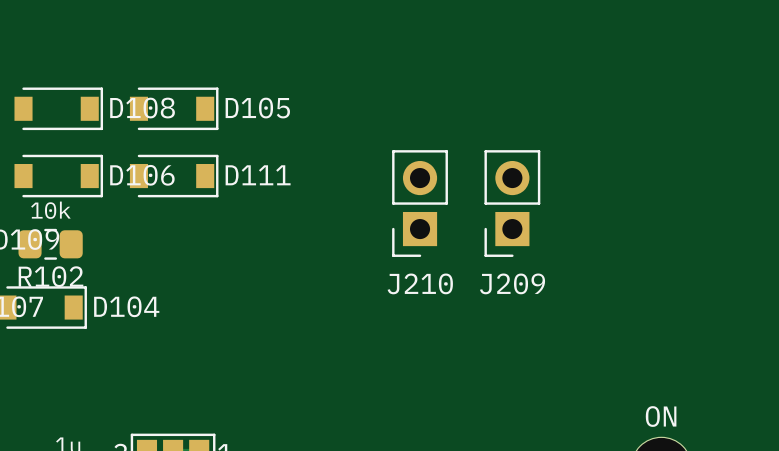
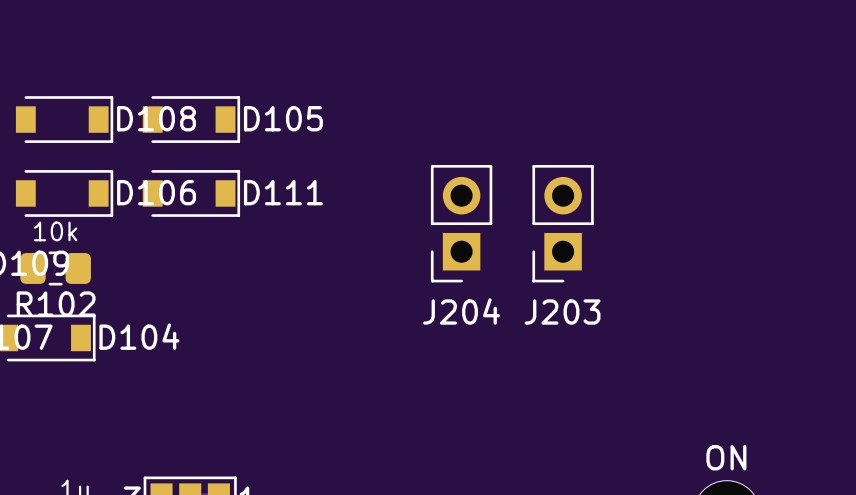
J210 name: J210 (420, 283) -> J204 (461, 311)
J209 name: J209 (512, 283) -> J203 (562, 312)

